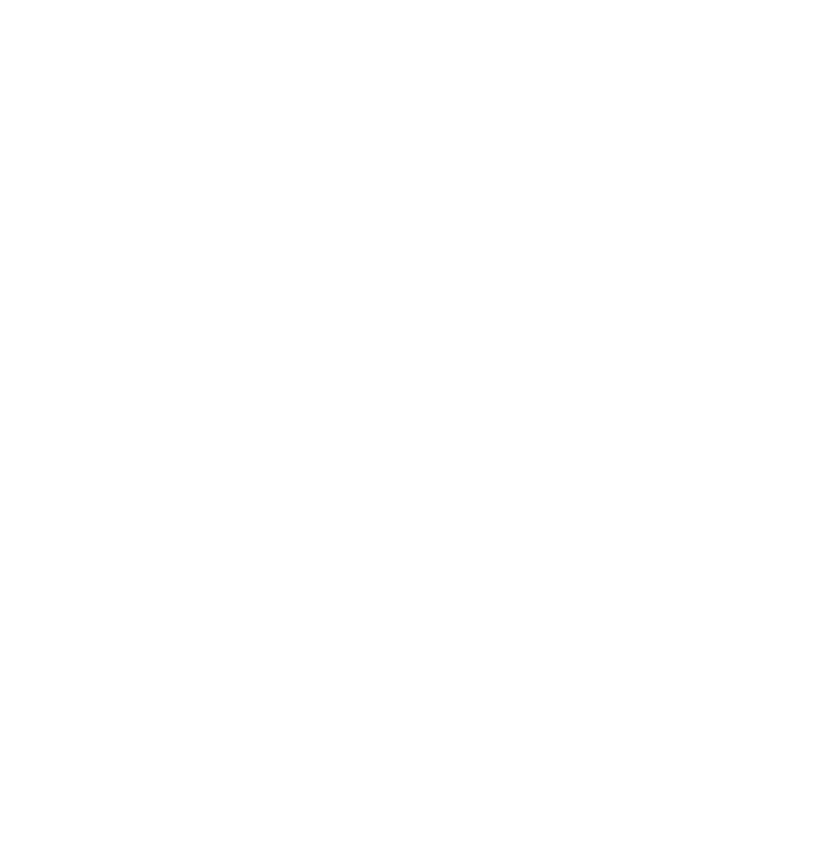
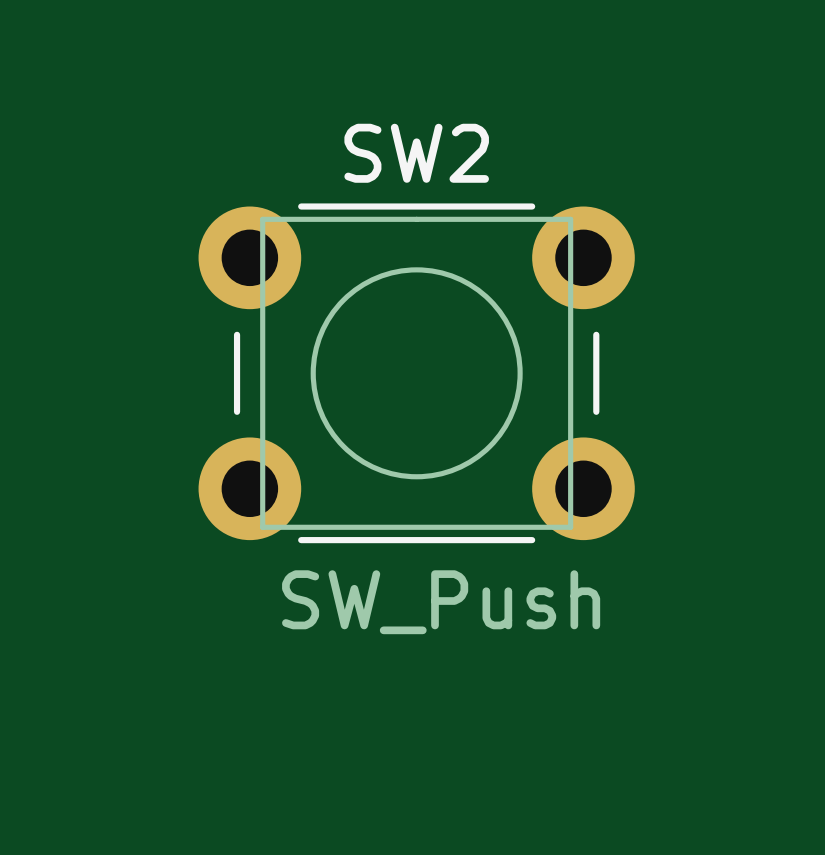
SW2: none -> SW_Push (416, 373)

